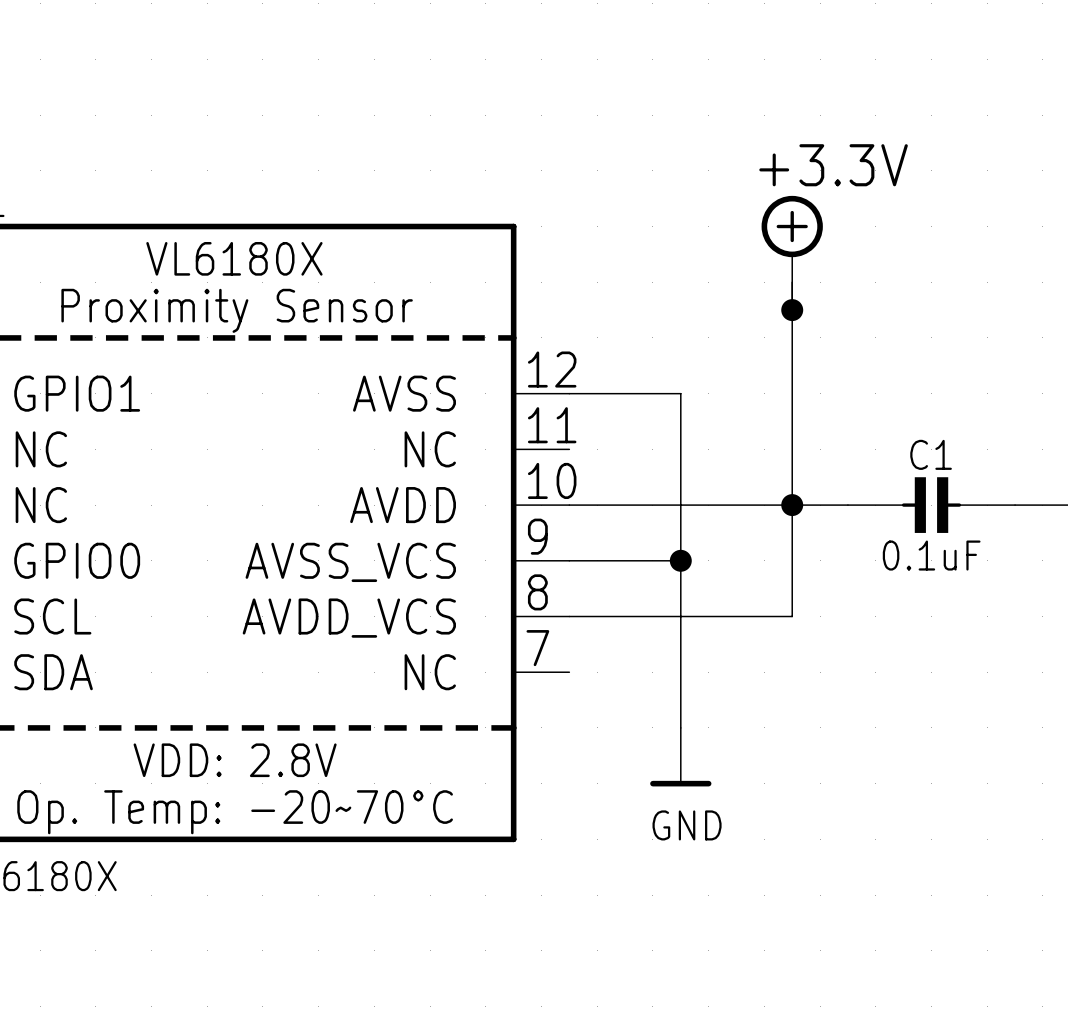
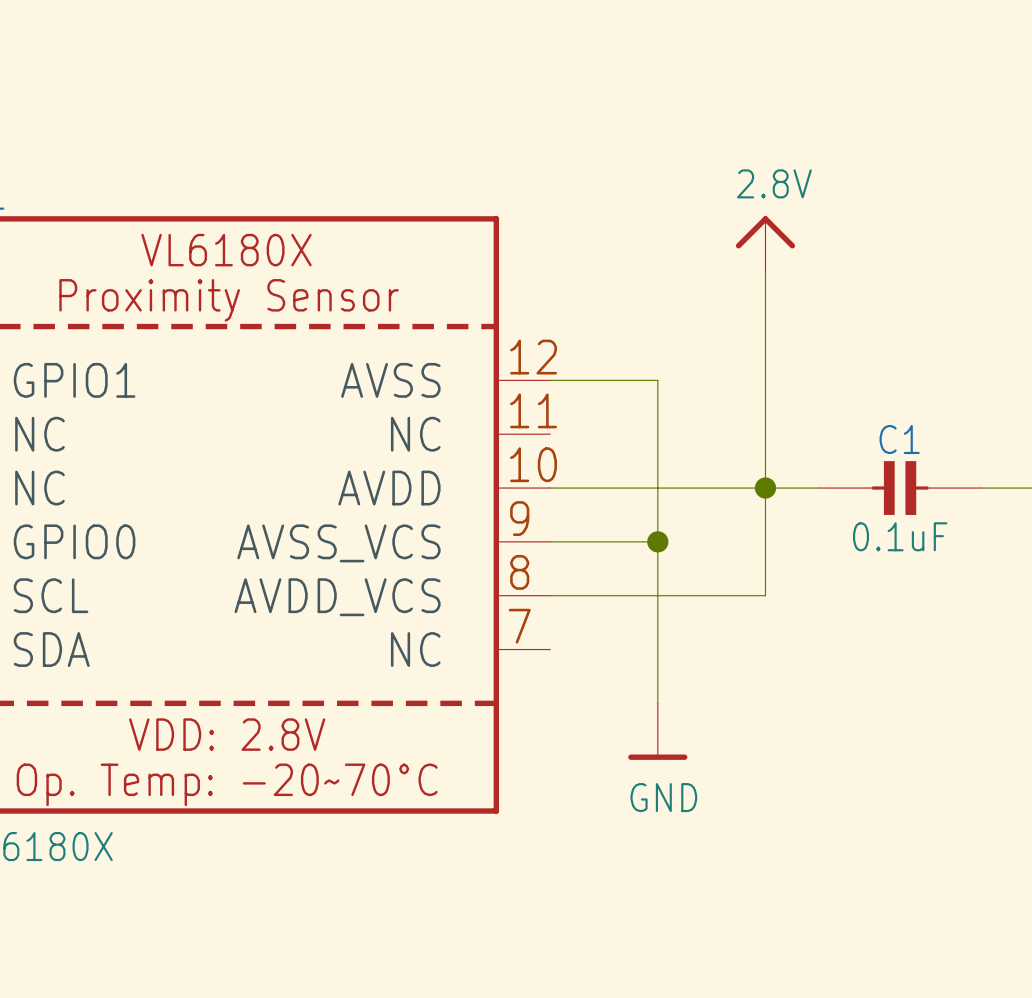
power symbol: +3.3V (792, 252) -> 2.8V (765, 244)
junction: (792, 310) -> none

